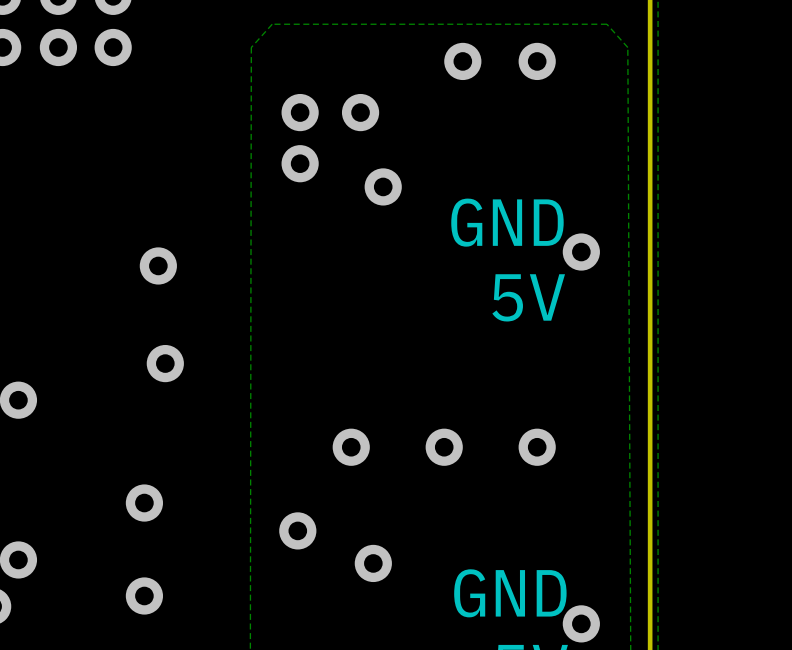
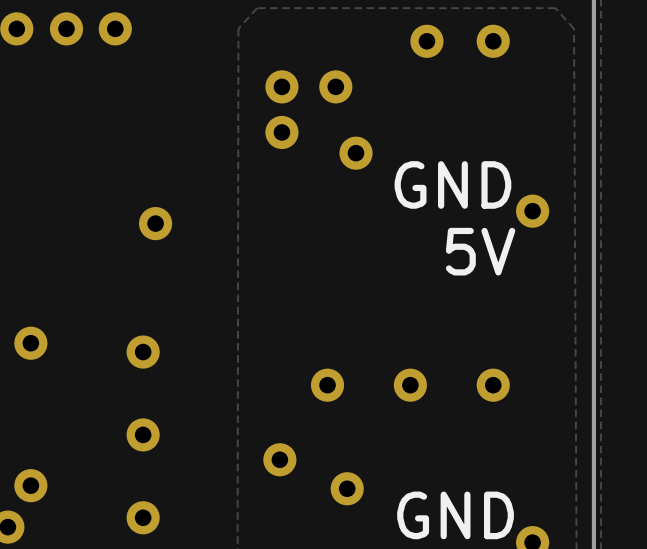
via position: (165, 363) -> (143, 352)

